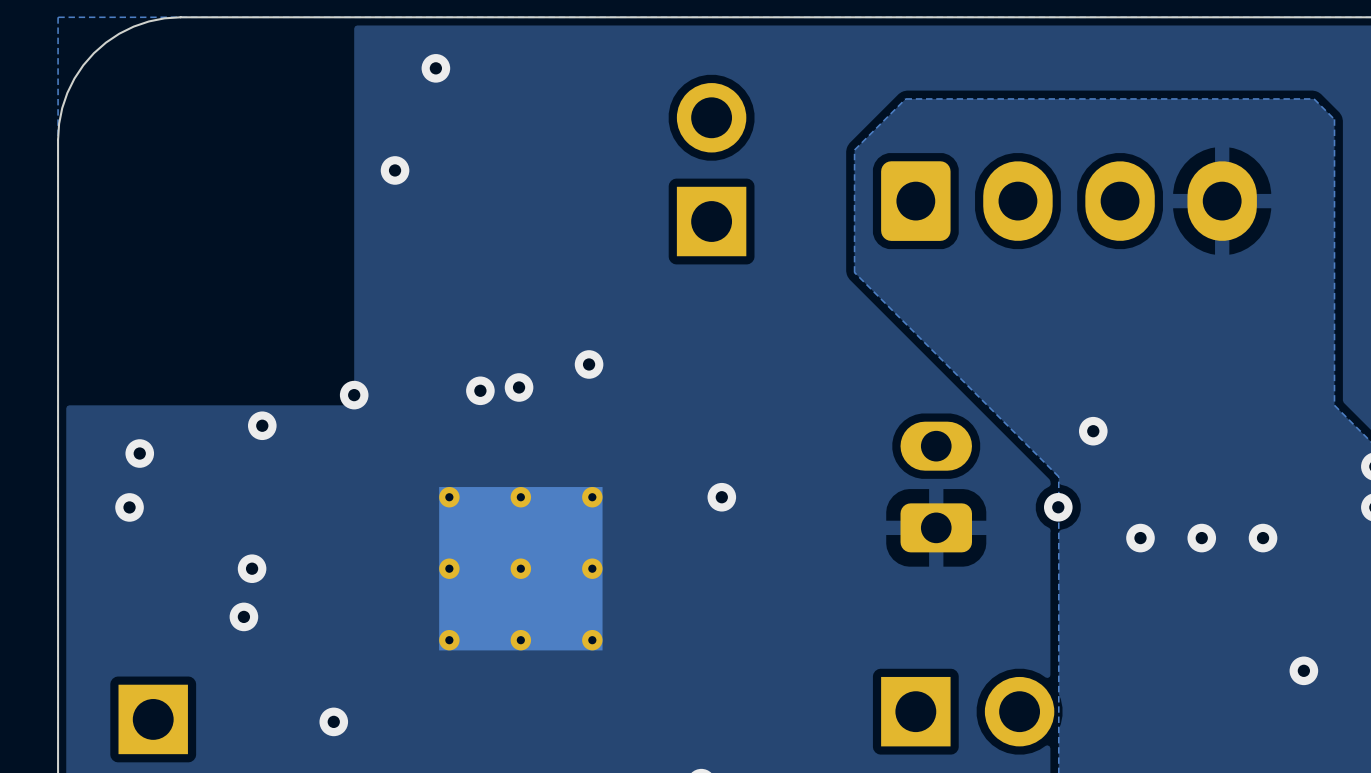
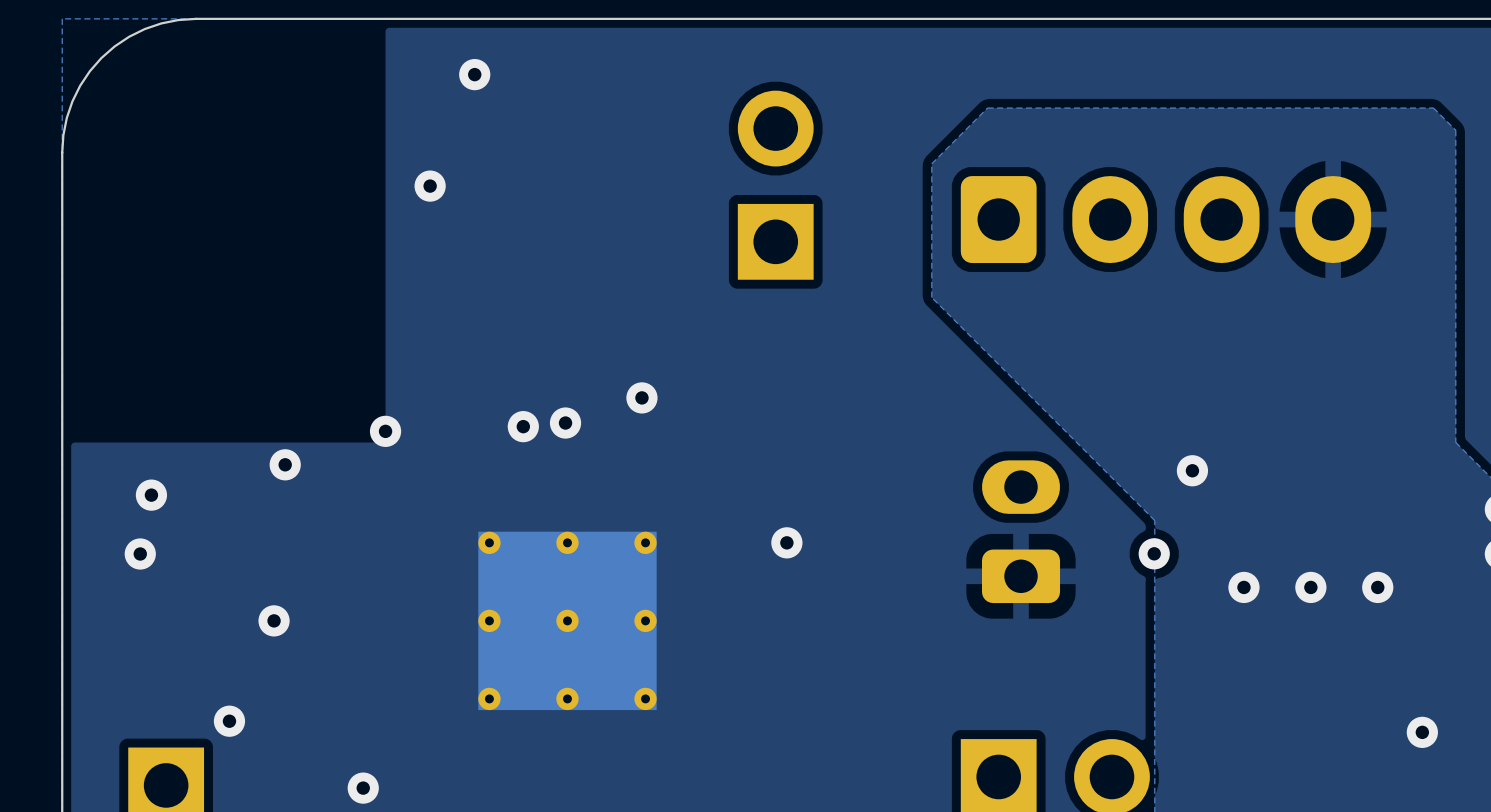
via position: (243, 616) -> (229, 721)

